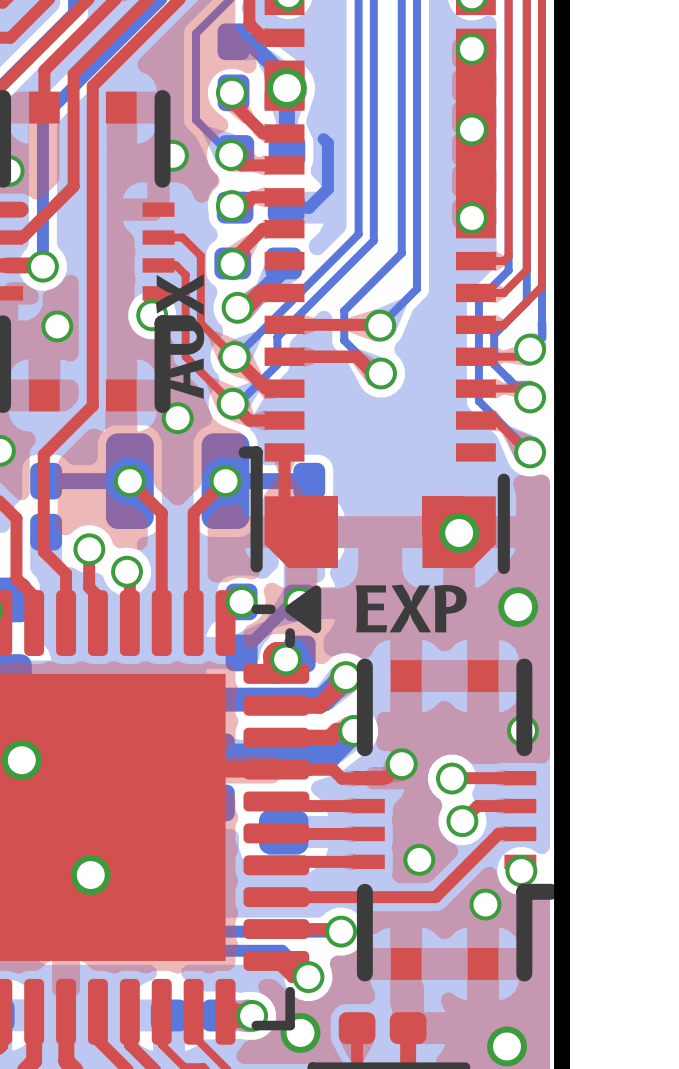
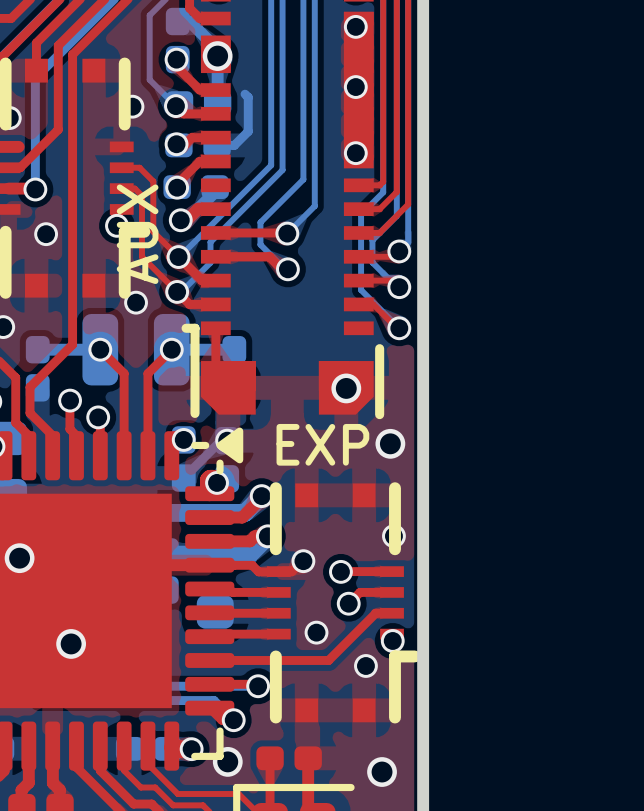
top track: (92, 405) (43, 454) (43, 551) (66, 573) (66, 596) -> (72, 293) (72, 344) (30, 387) (30, 413) (52, 435)

